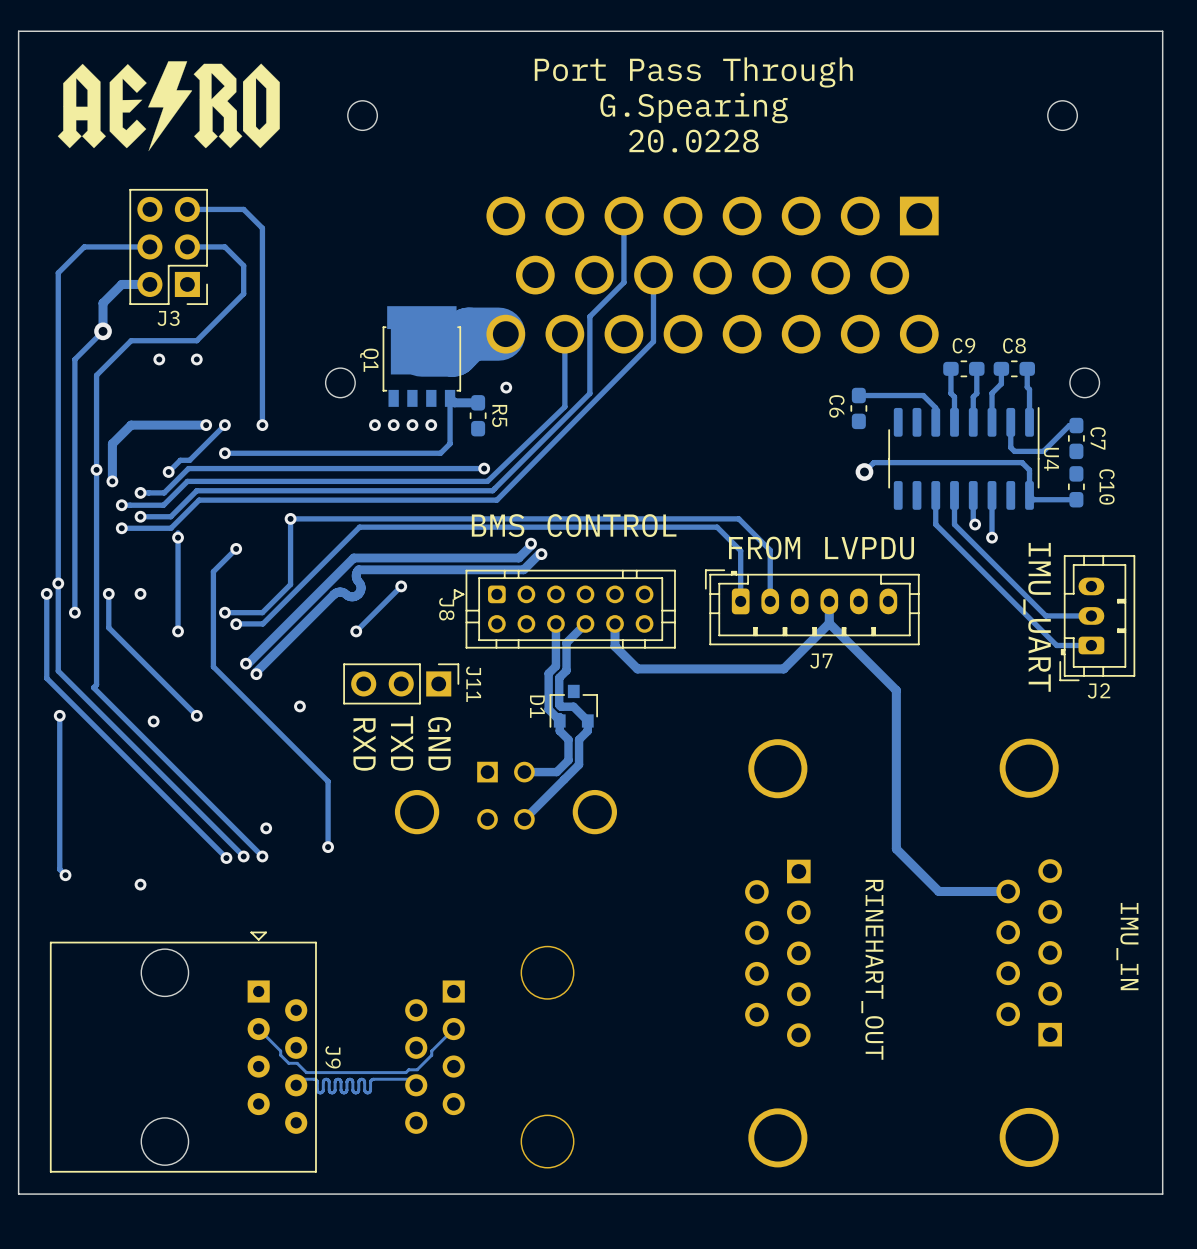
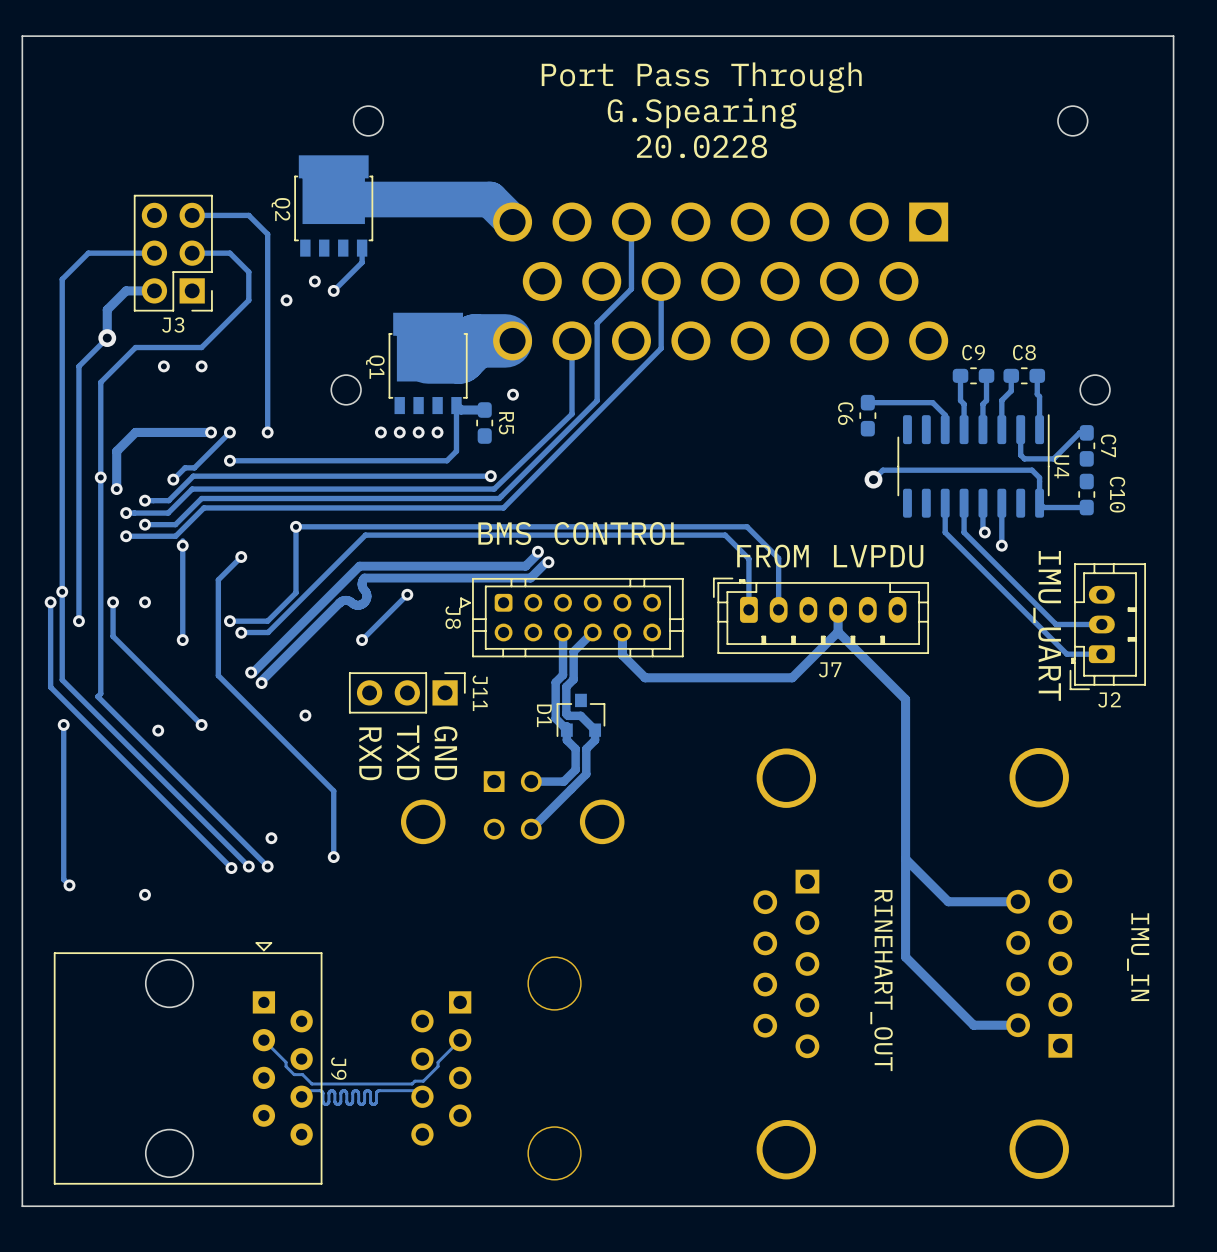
drawing: [57, 61, 280, 152] -> none
track: none -> (333, 199) (490, 199) (512, 222)
Q2: none -> (333, 205)
track: none -> (362, 248) (362, 262) (333, 290)
via: none -> (314, 281)
via: none -> (333, 290)
via: none -> (286, 300)
track: none -> (905, 858) (905, 957) (973, 1025) (1018, 1025)

